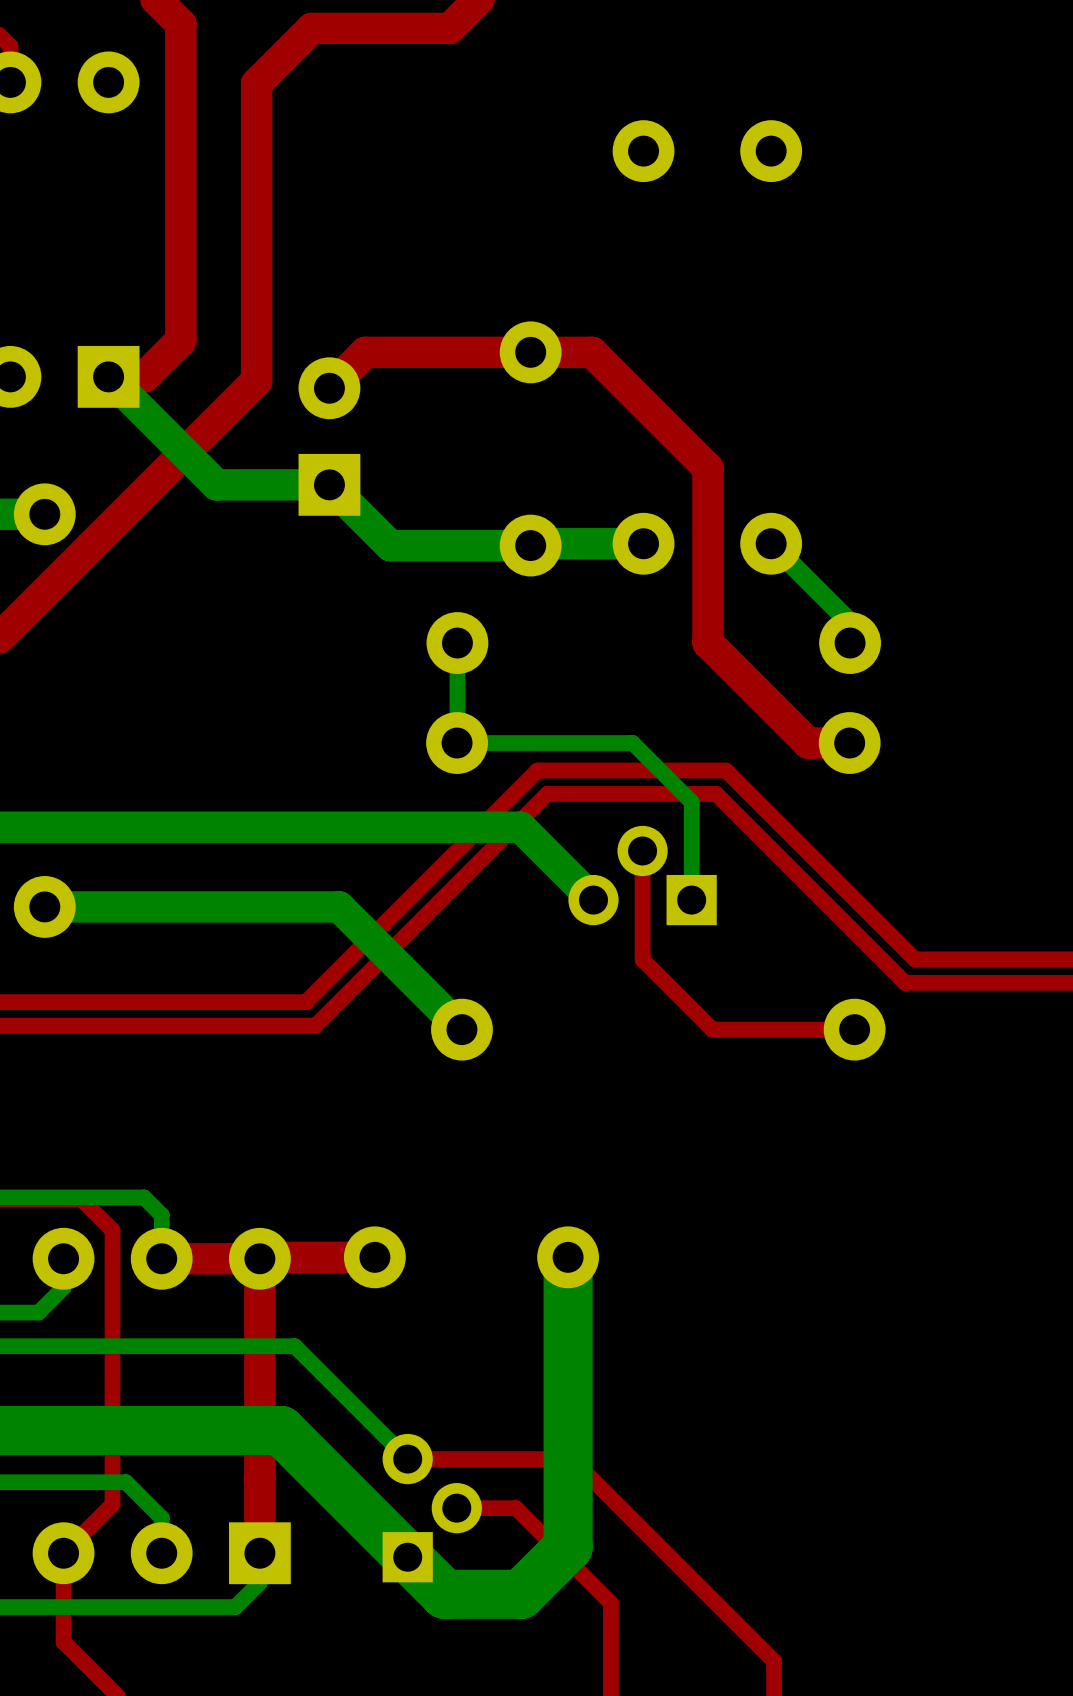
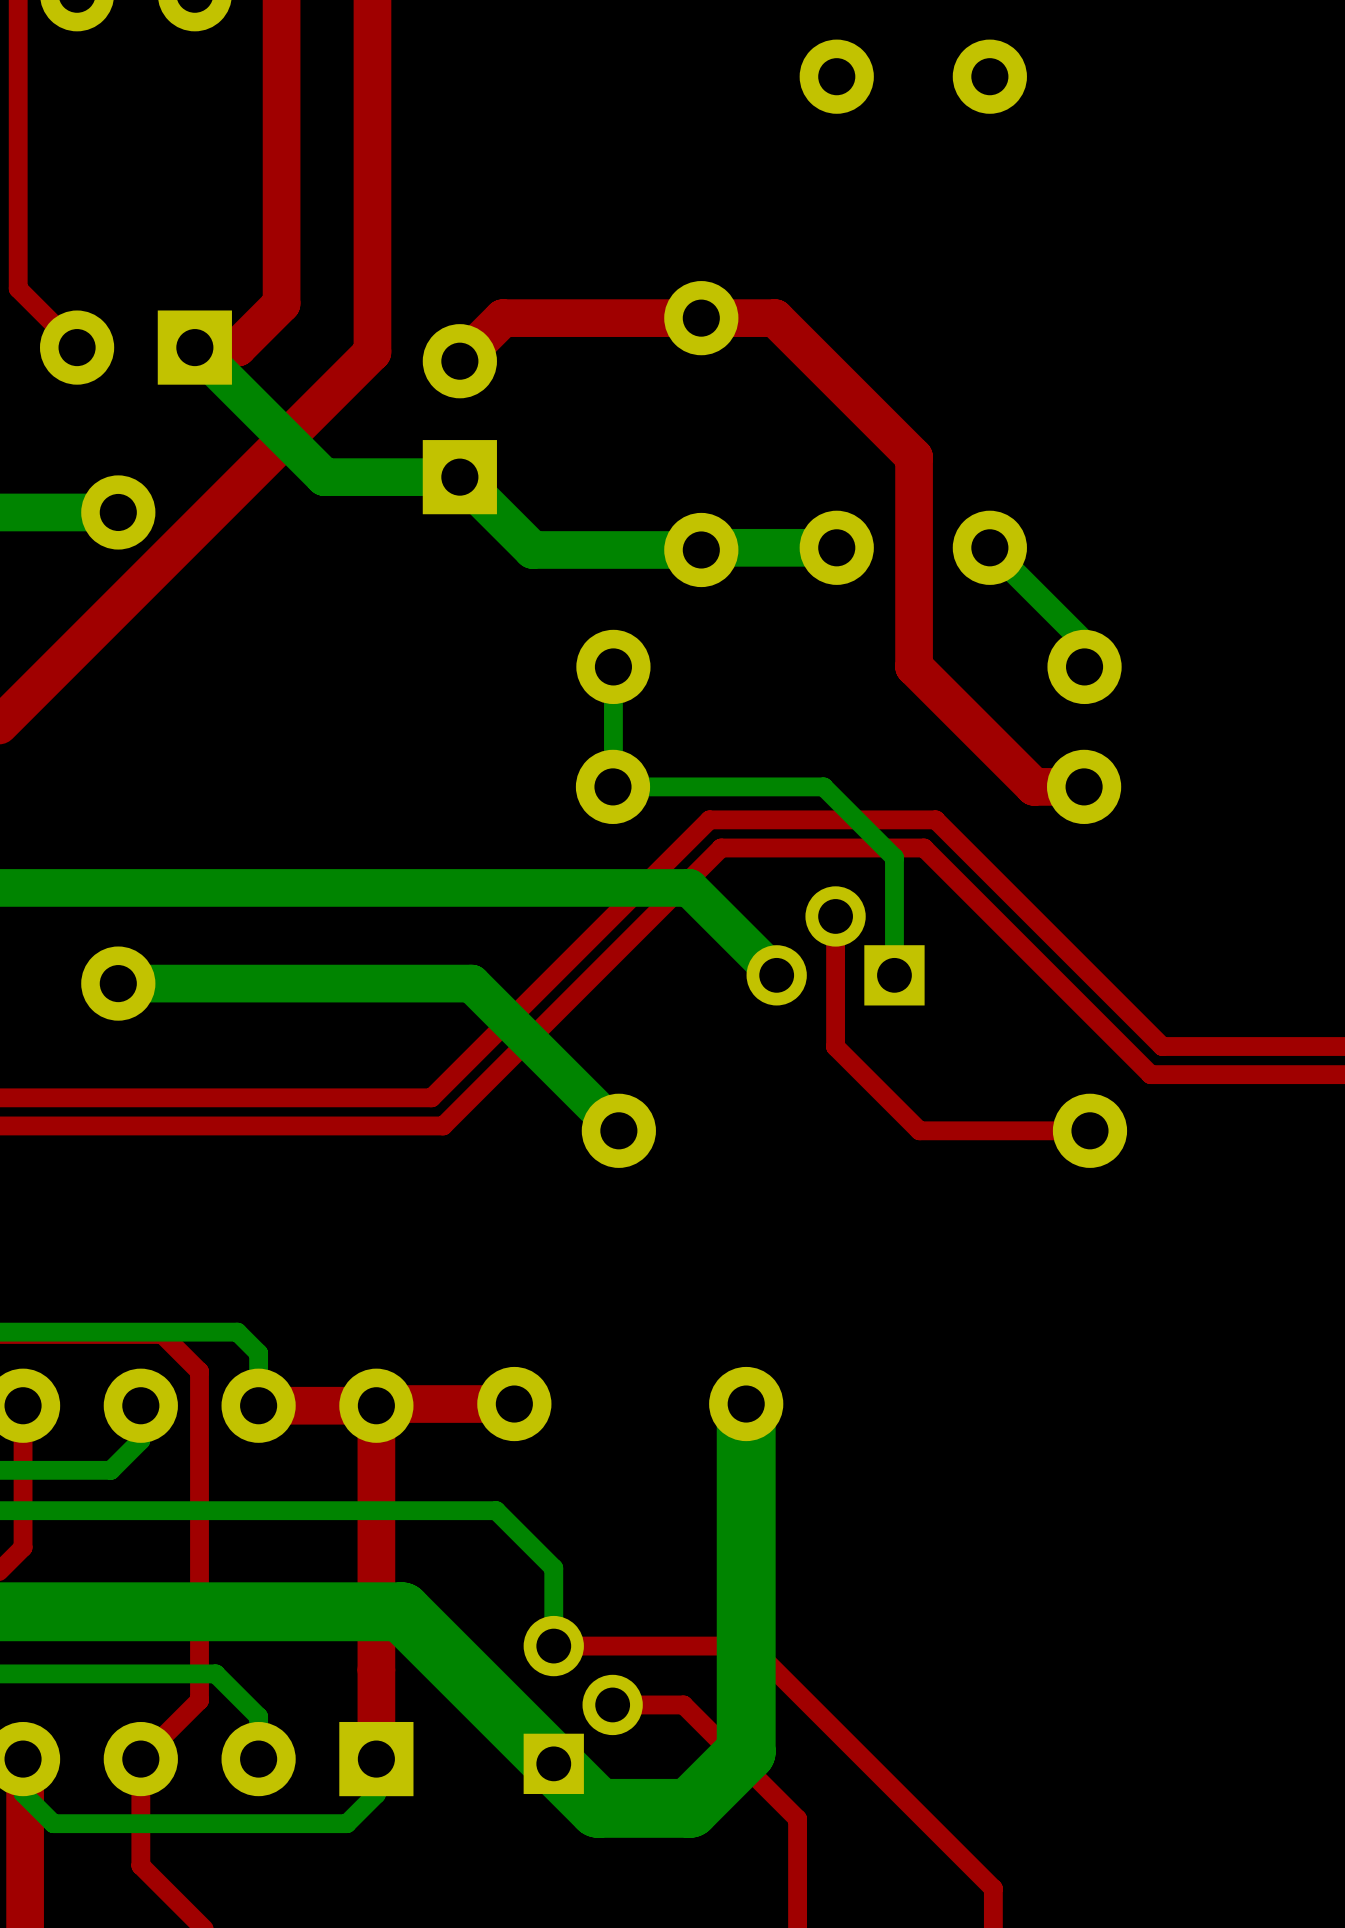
bottom track: (294, 1346) (407, 1459) -> (418, 1510) (496, 1510) (553, 1568) (553, 1646)

